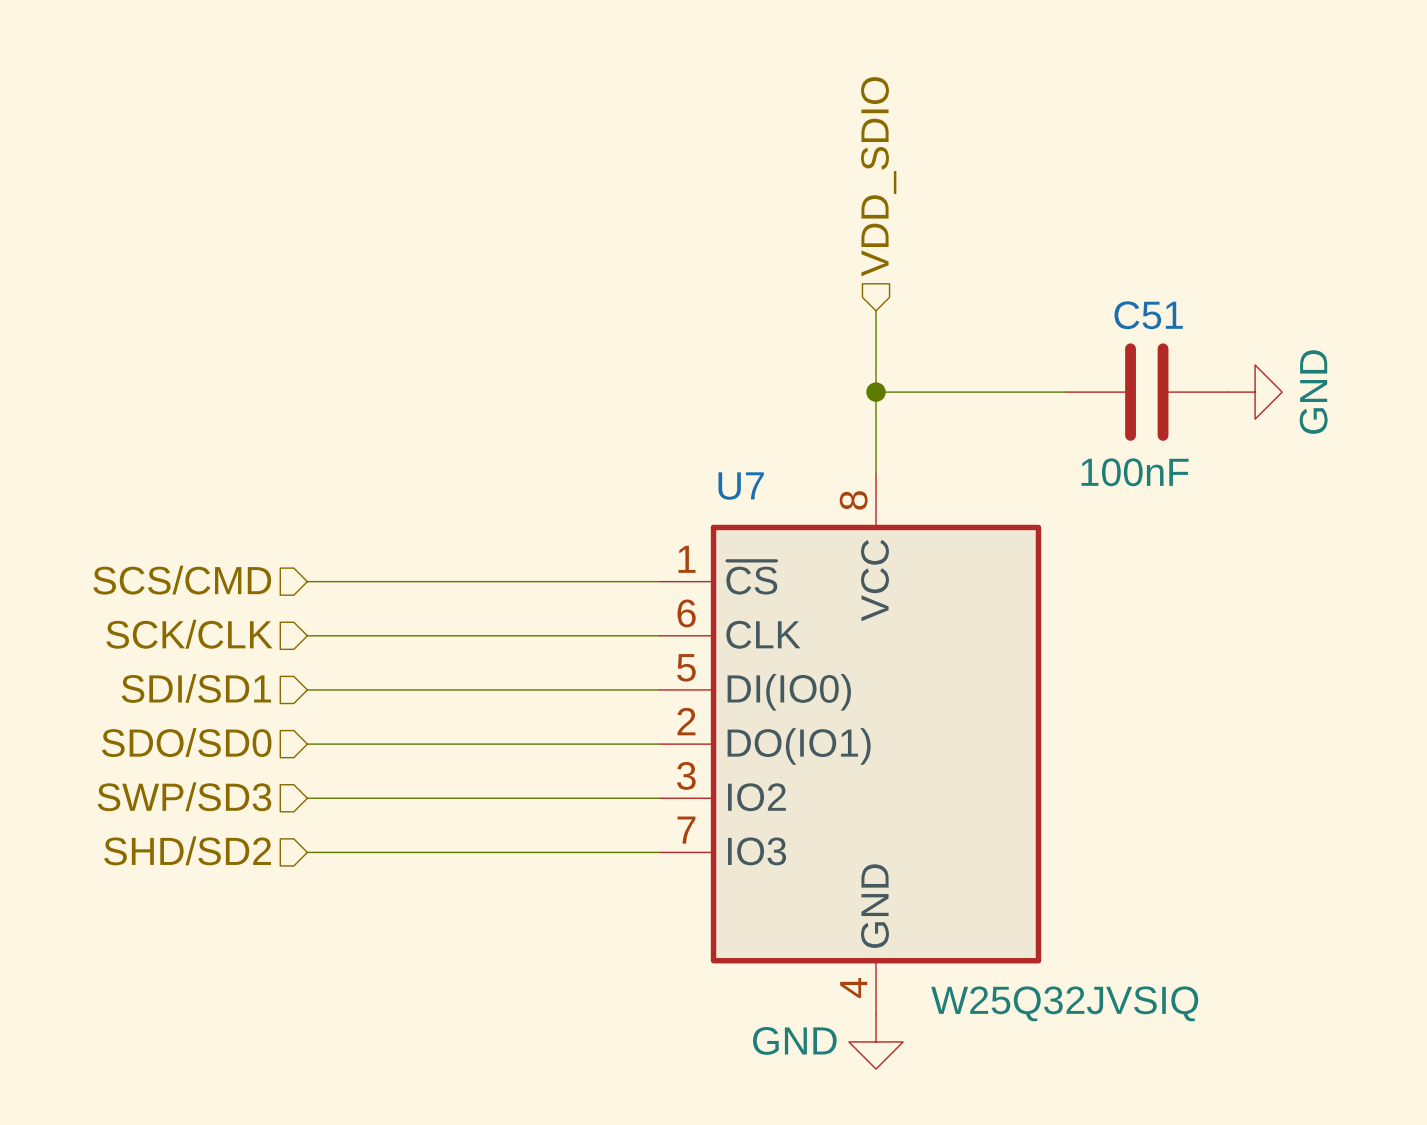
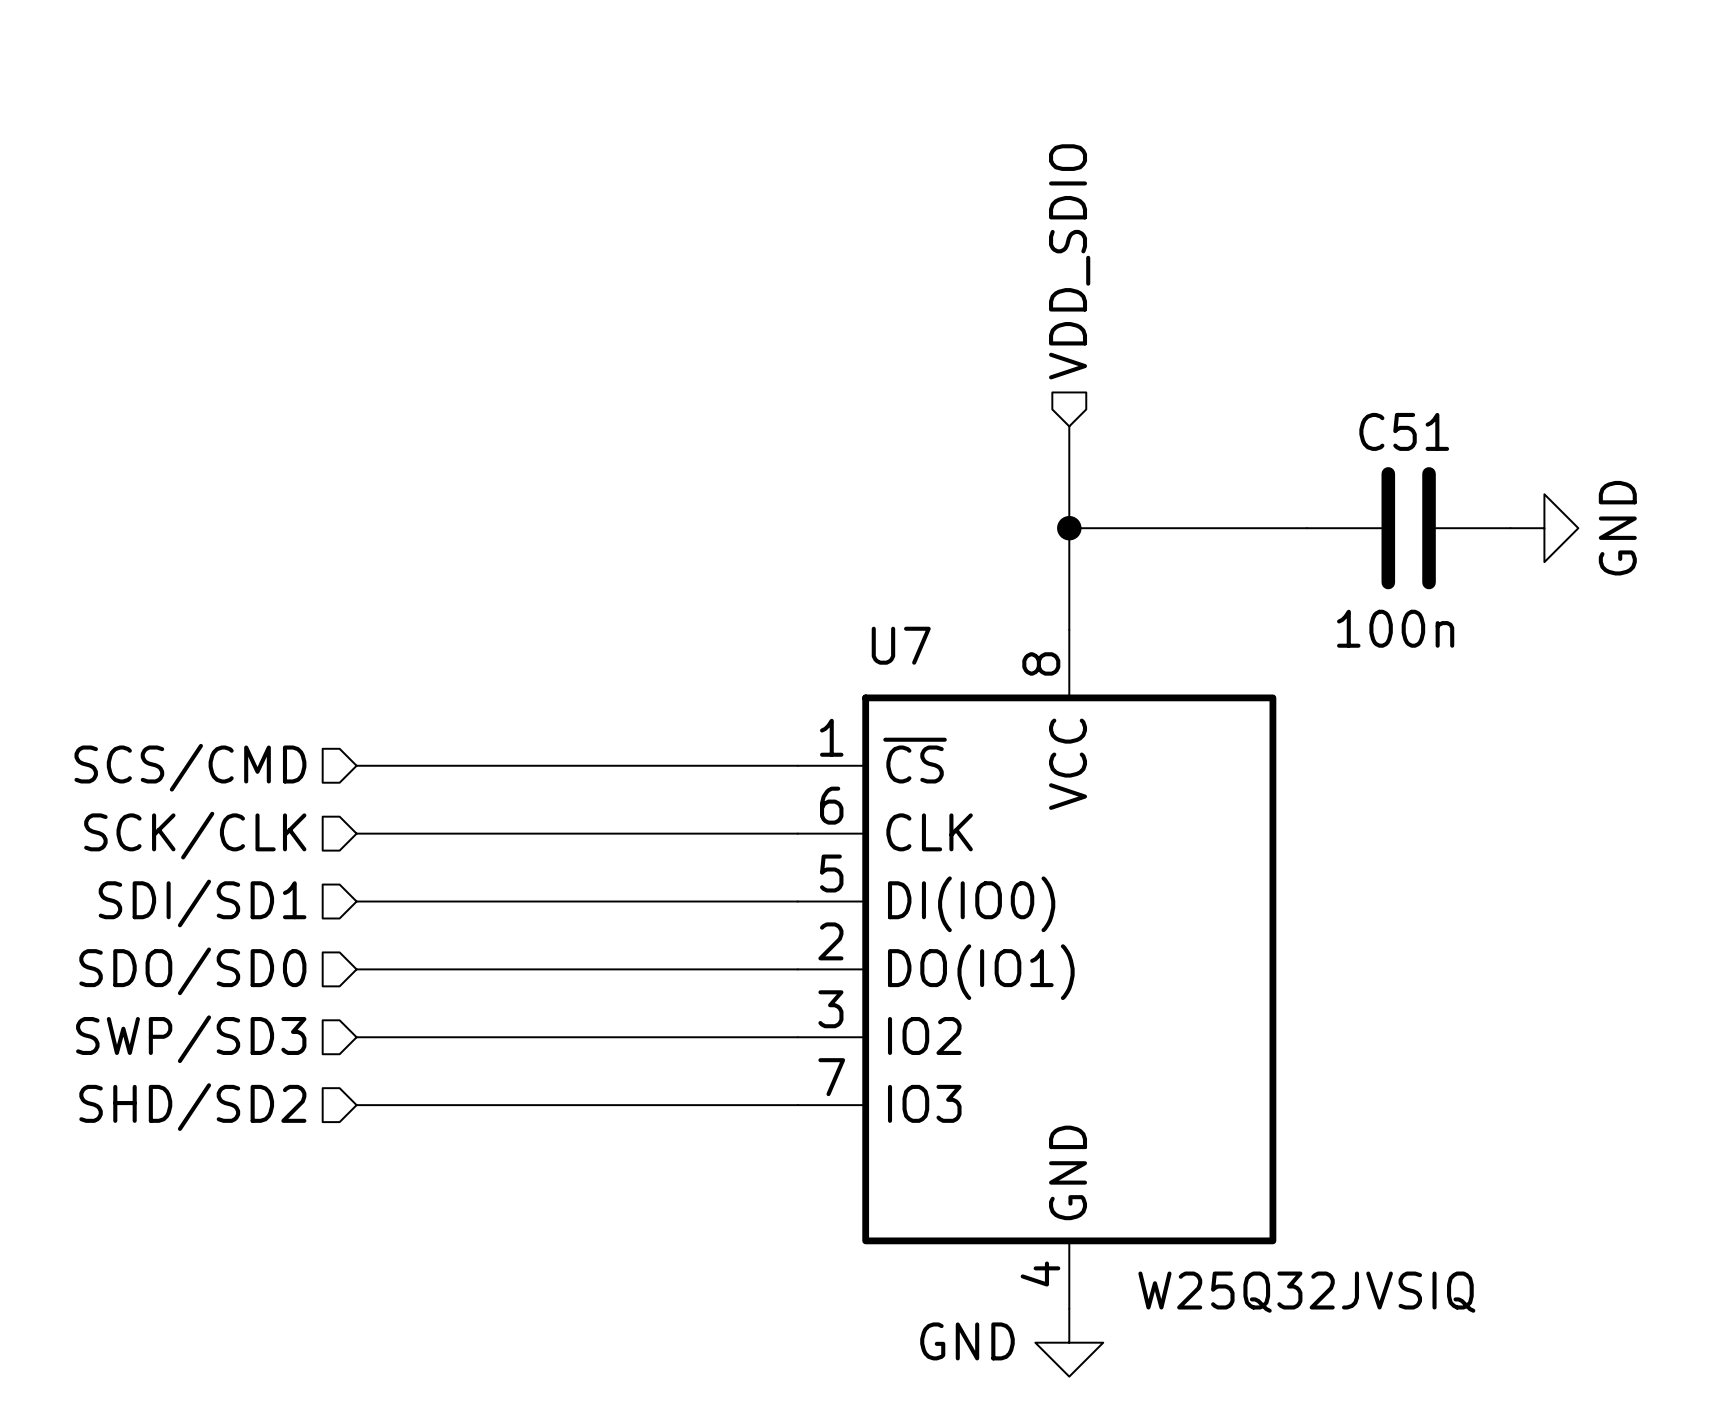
C51 value: 100nF (1135, 472) -> 100n (1395, 628)

